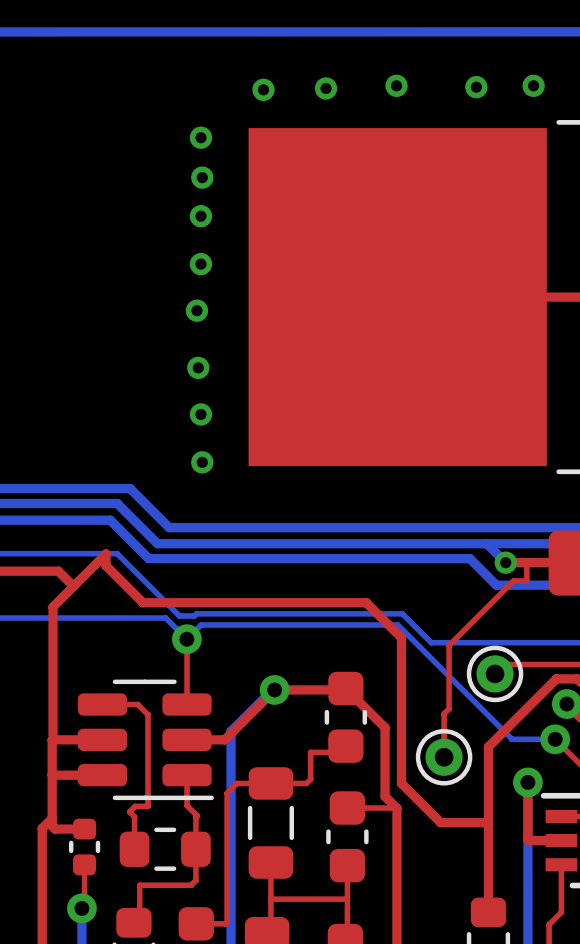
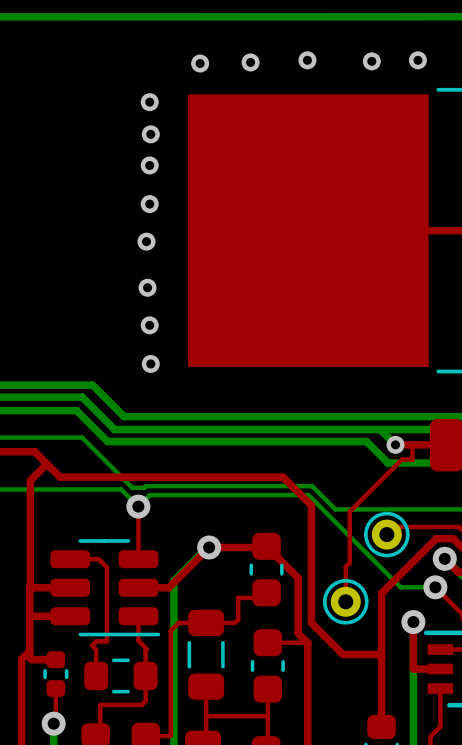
top track: (73, 586) (105, 554) (105, 565) (143, 602) -> (47, 463) (60, 477) (102, 477)

